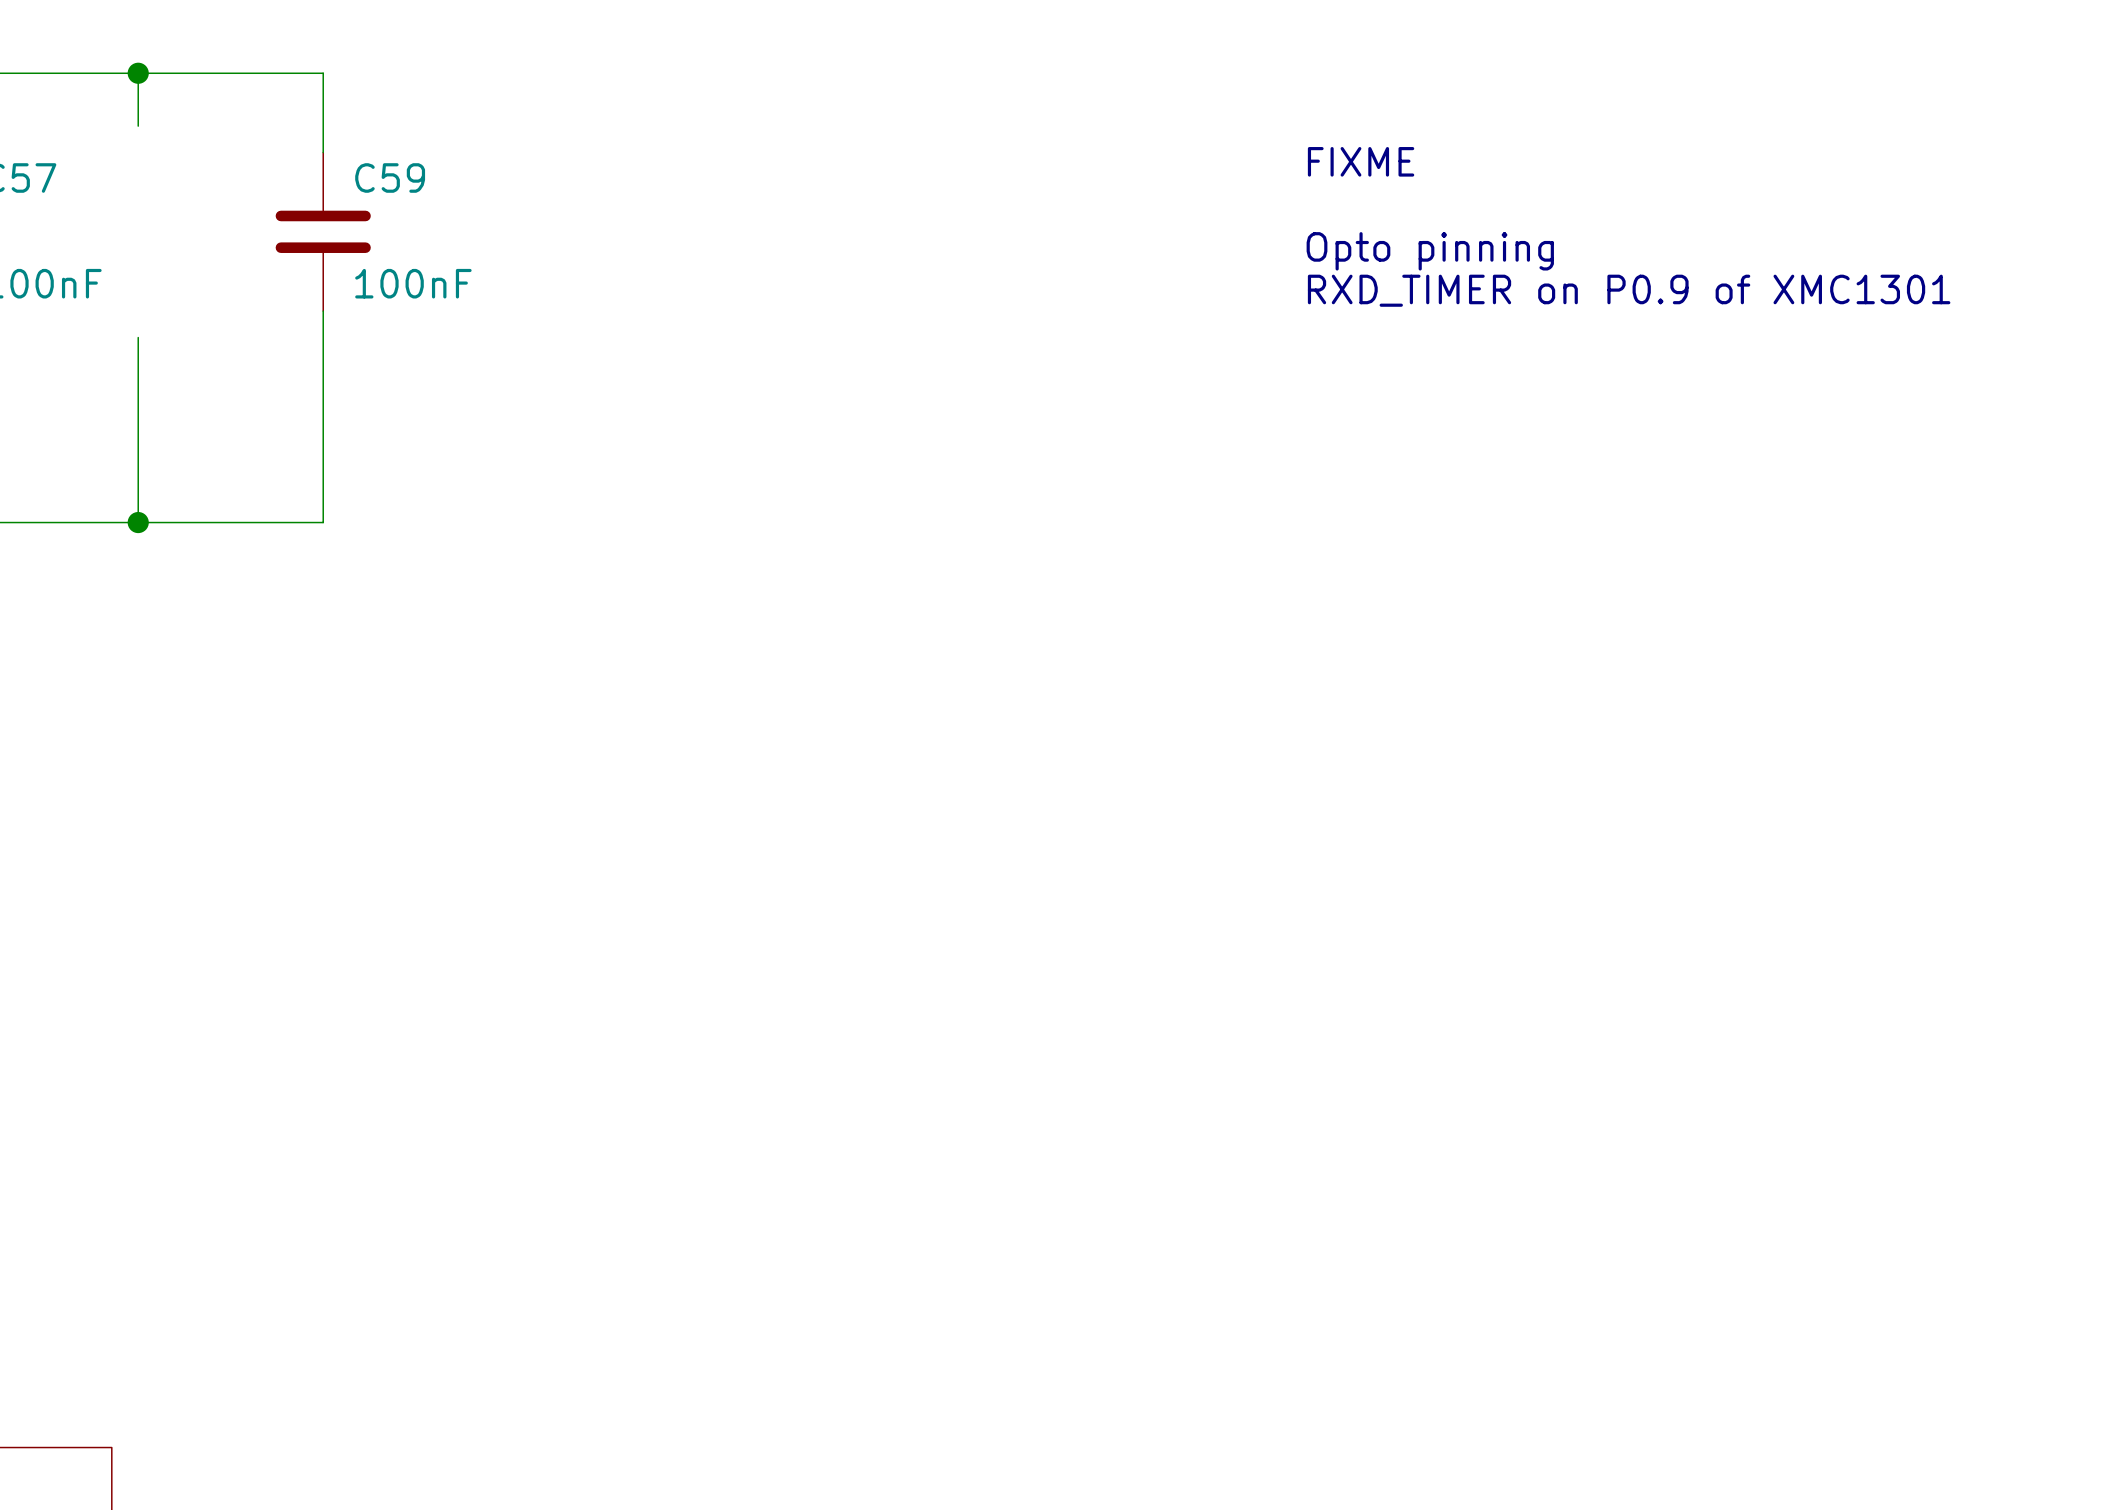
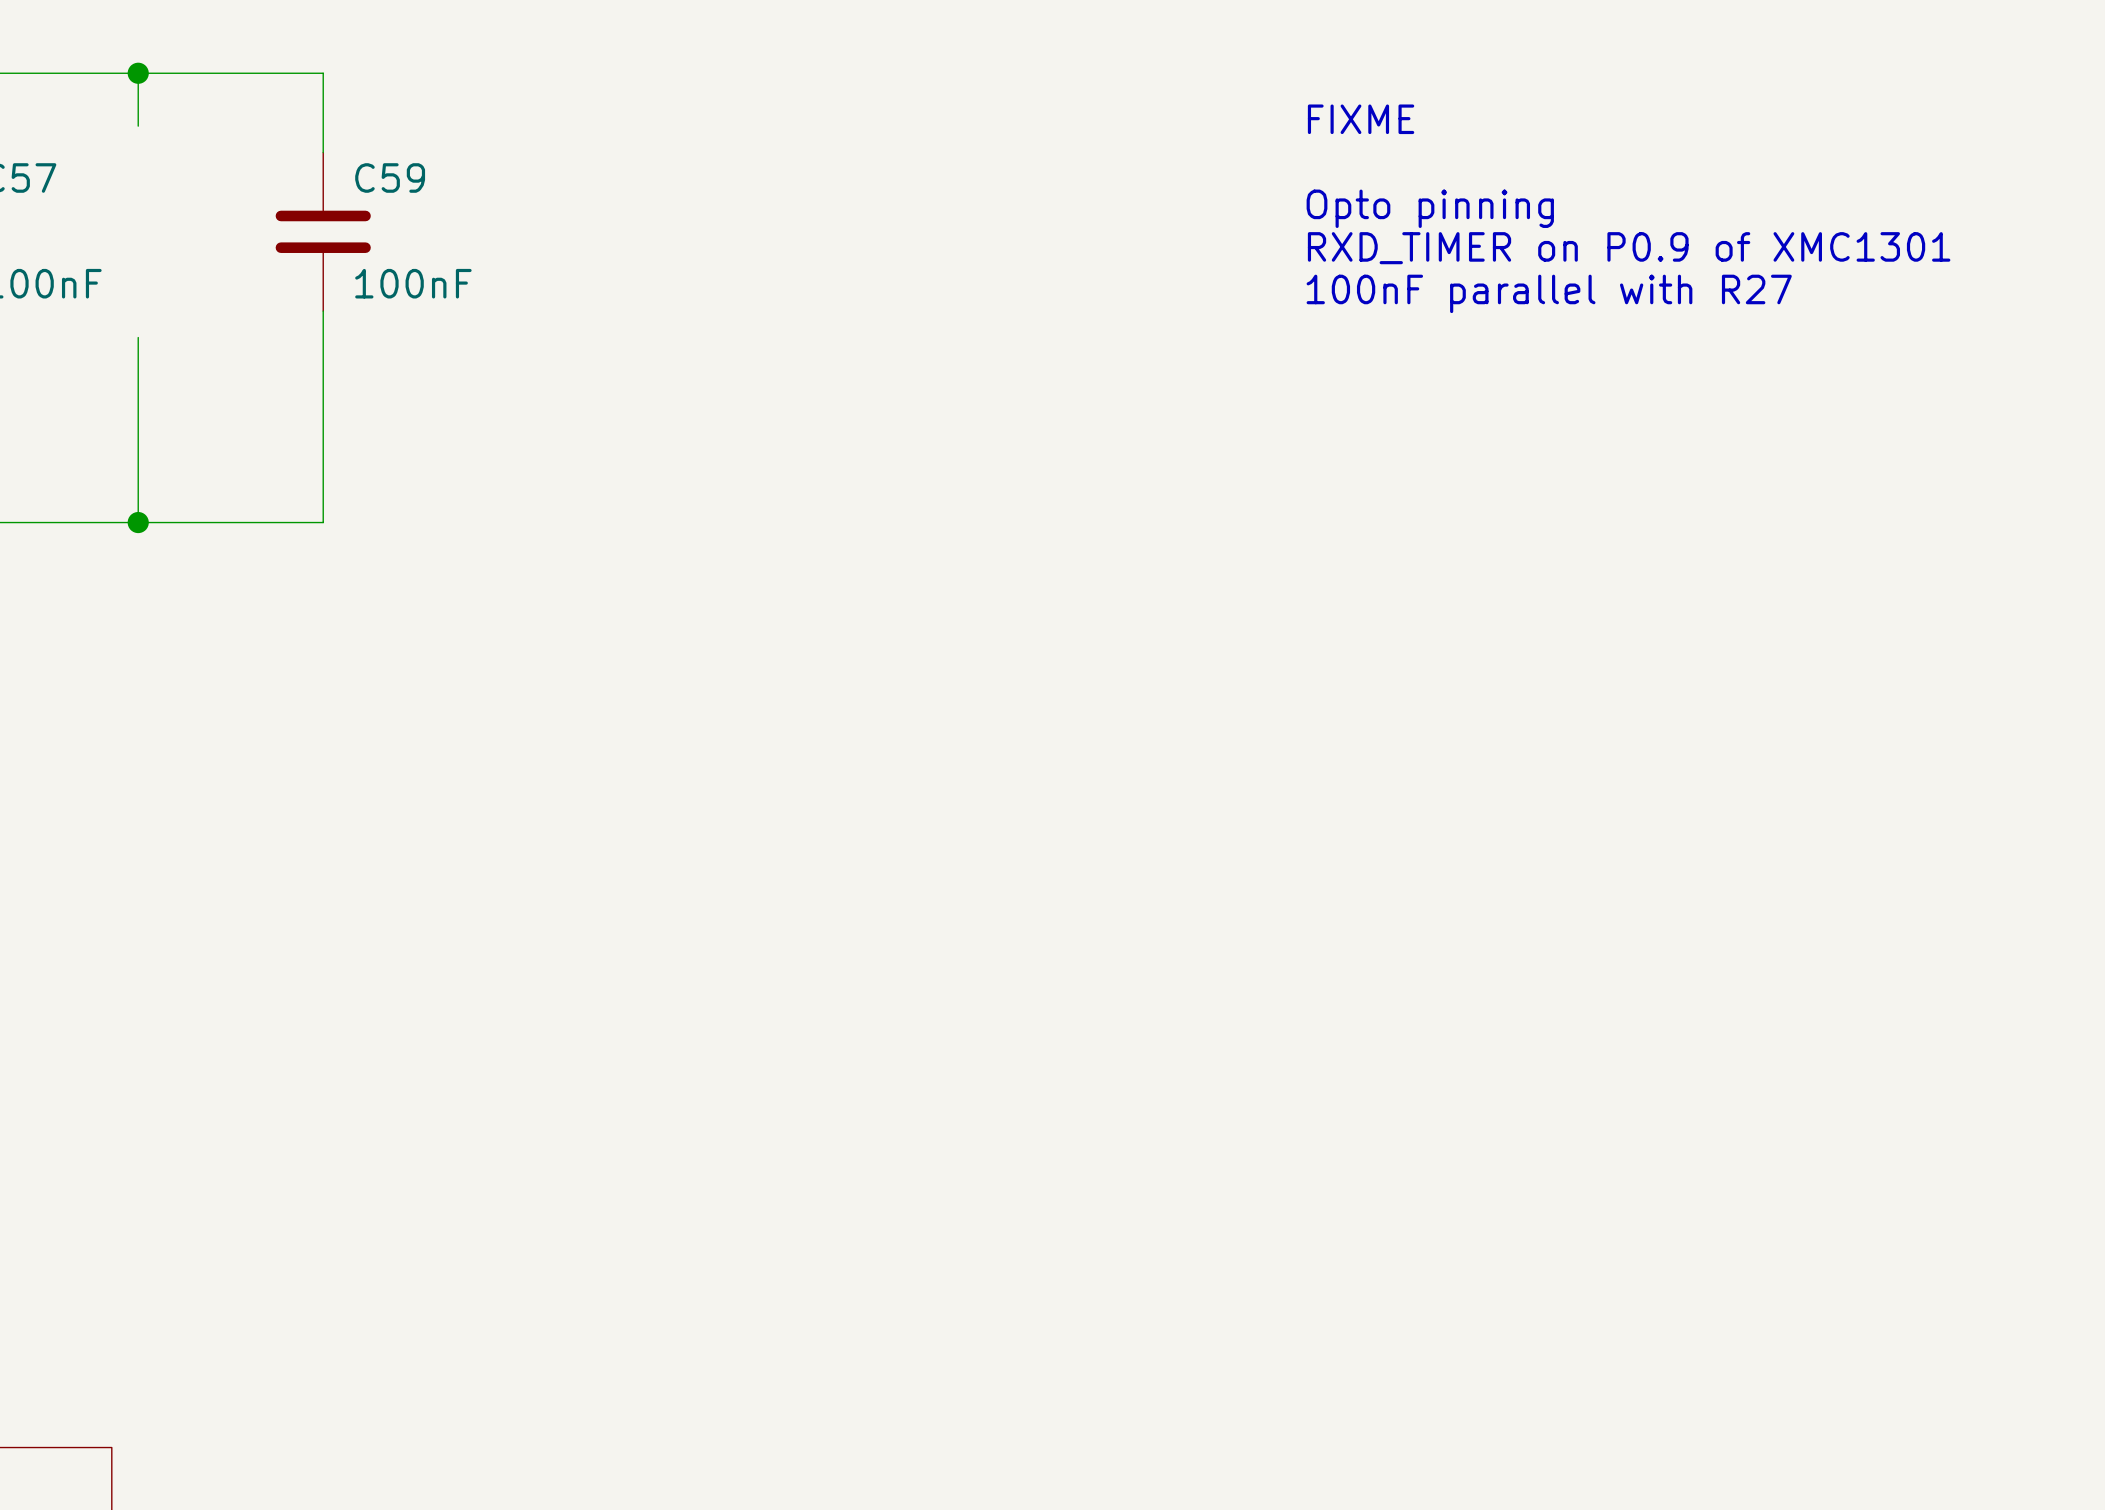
text position: FIXME (1361, 161) -> FIXME (1361, 119)
text: none -> Opto pinning (1430, 208)
text: Opto pinning (1430, 251) -> RXD_TIMER on P0.9 of XMC1301 (1629, 248)
text: RXD_TIMER on P0.9 of XMC1301 (1629, 290) -> 100nF parallel with R27 (1549, 293)

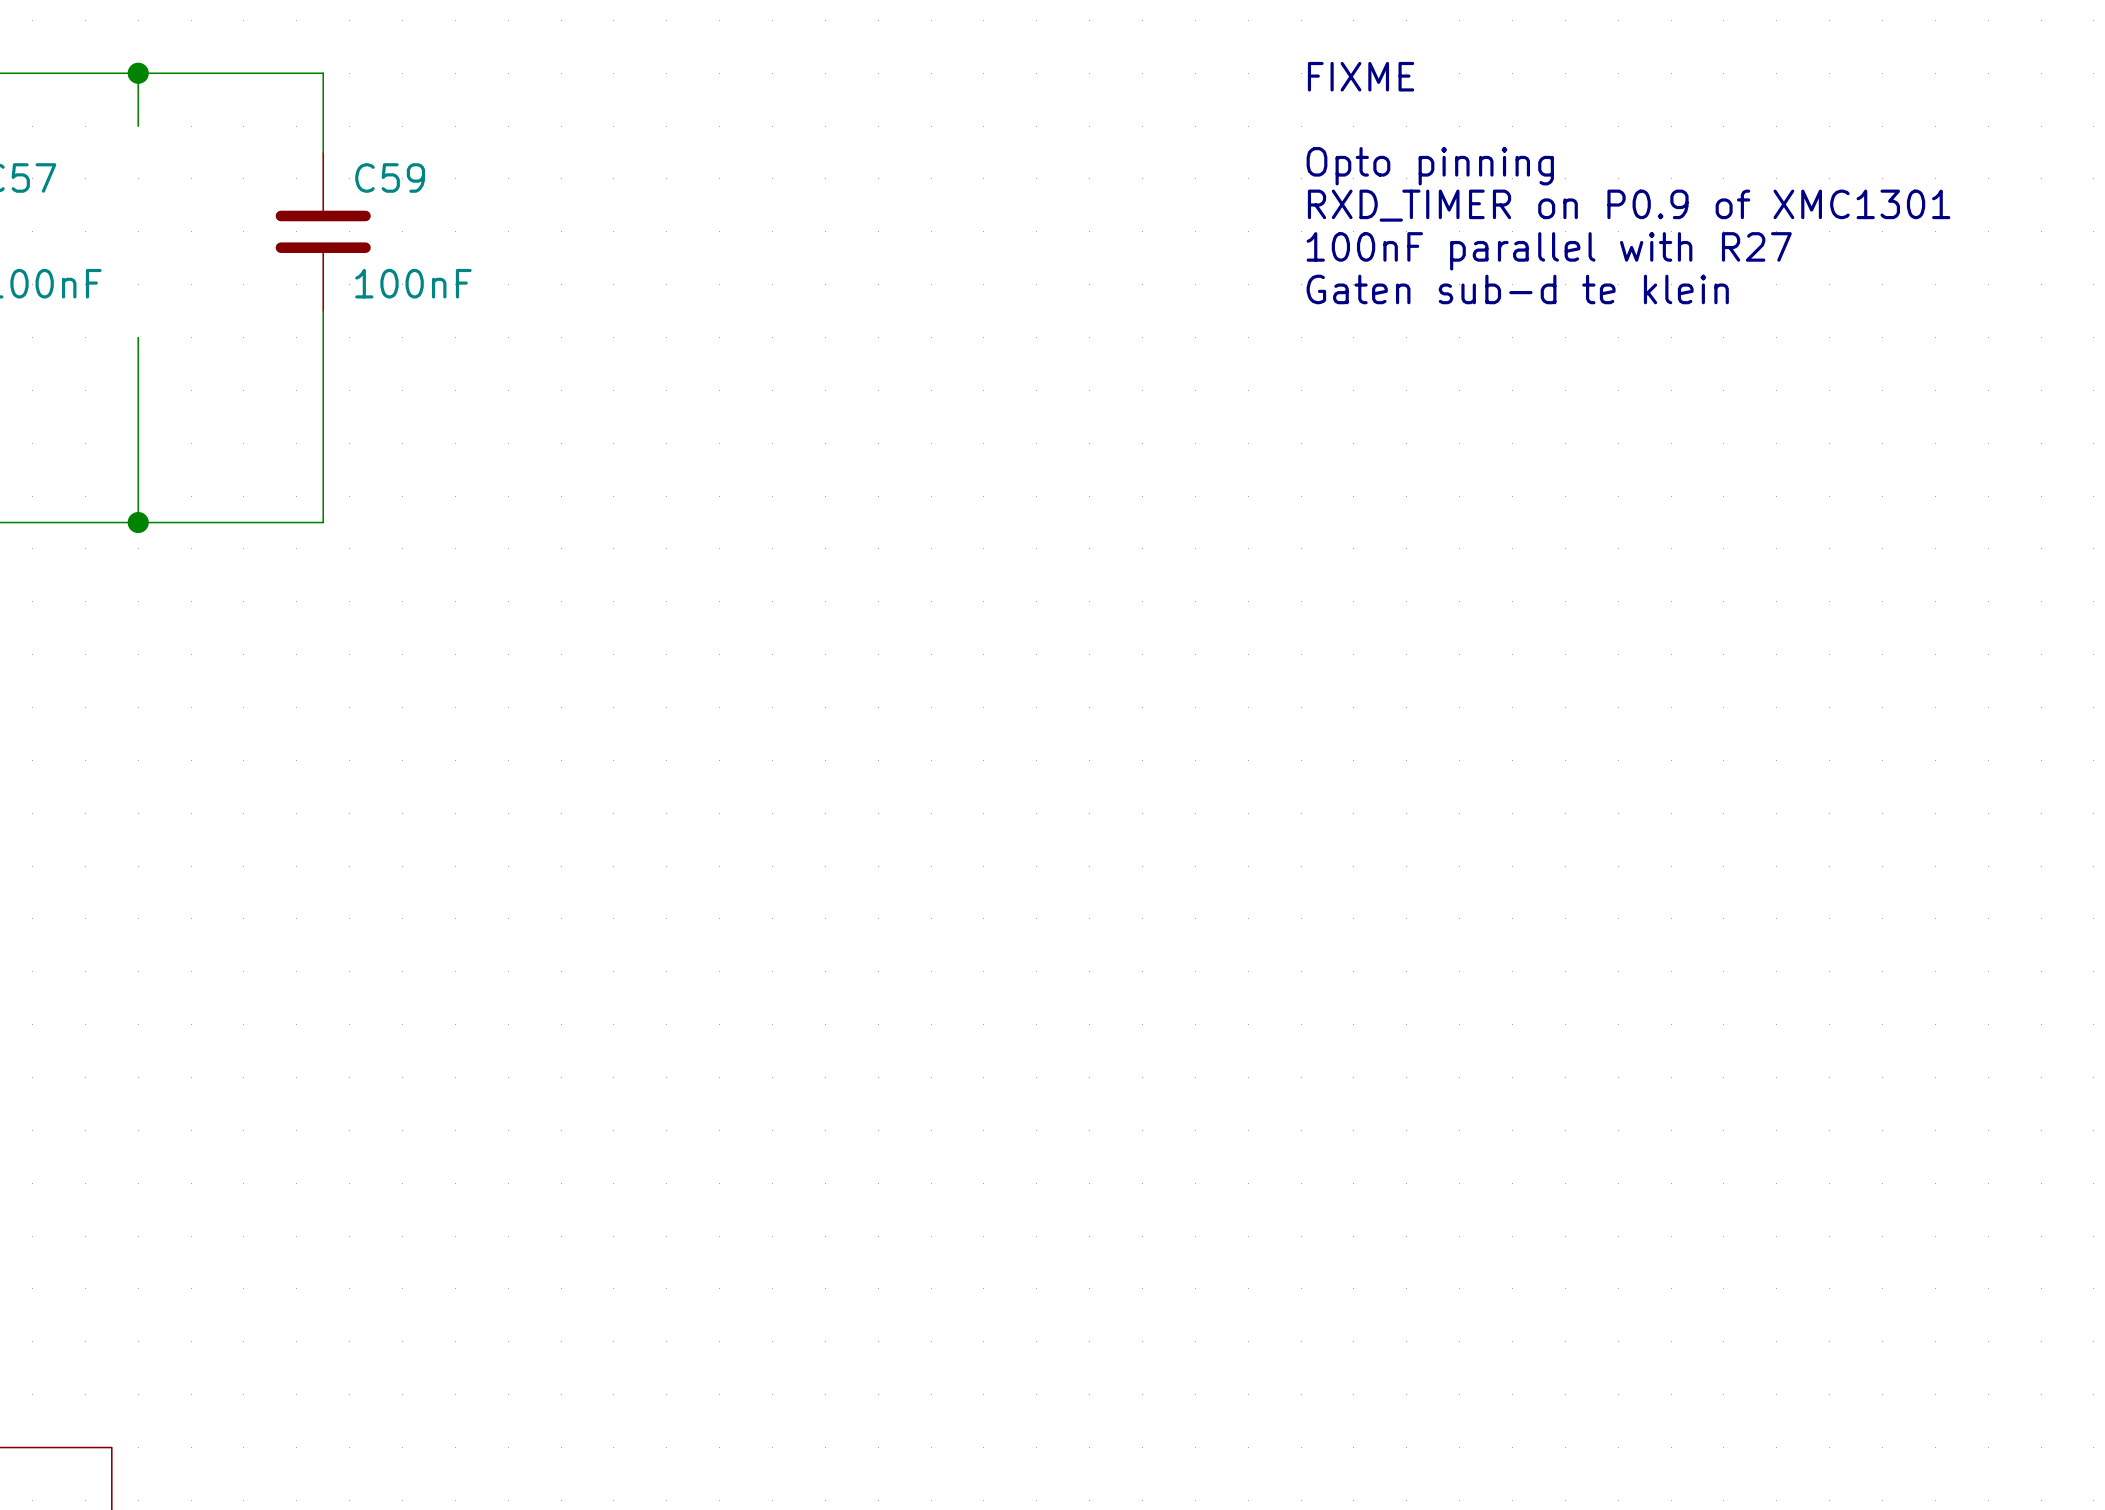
text position: FIXME (1361, 119) -> FIXME (1361, 76)
text: none -> Opto pinning (1430, 166)
text: Opto pinning (1430, 208) -> RXD_TIMER on P0.9 of XMC1301 (1629, 205)
text: RXD_TIMER on P0.9 of XMC1301 (1629, 248) -> 100nF parallel with R27 (1549, 251)
text: 100nF parallel with R27 (1549, 293) -> Gaten sub-d te klein (1517, 289)

